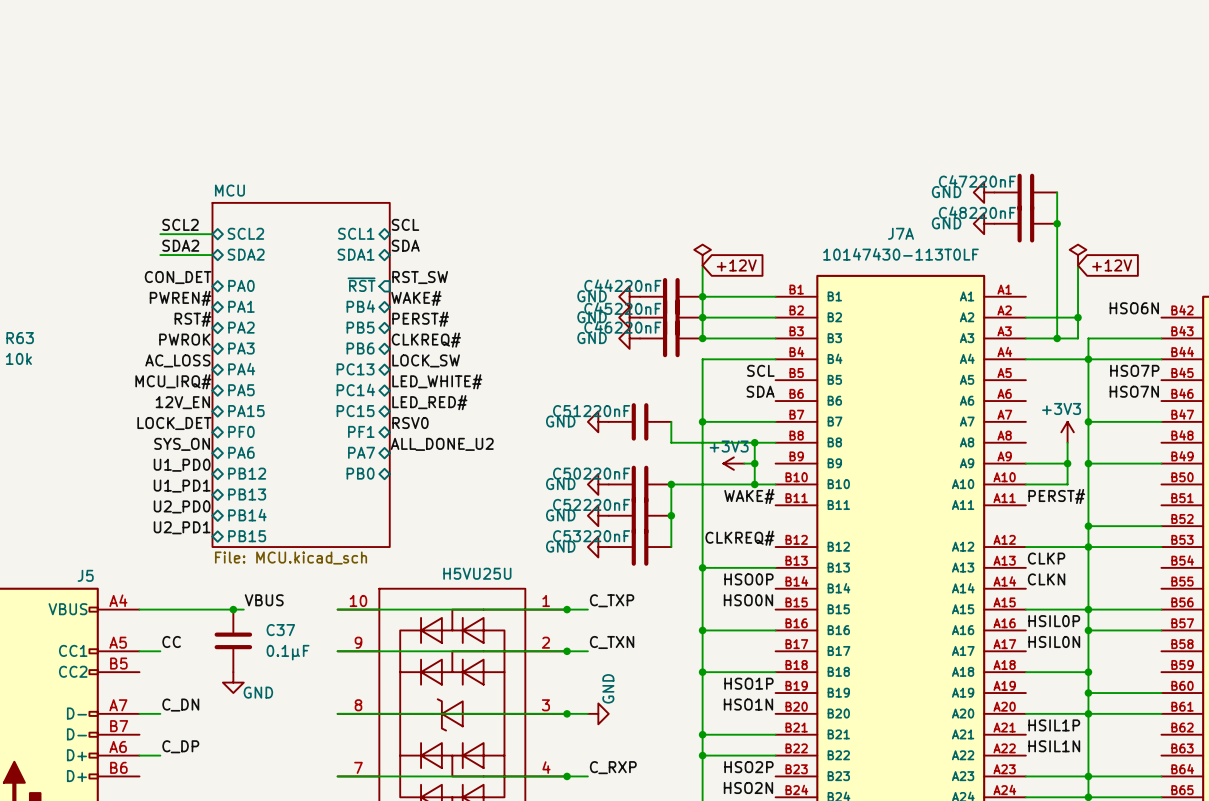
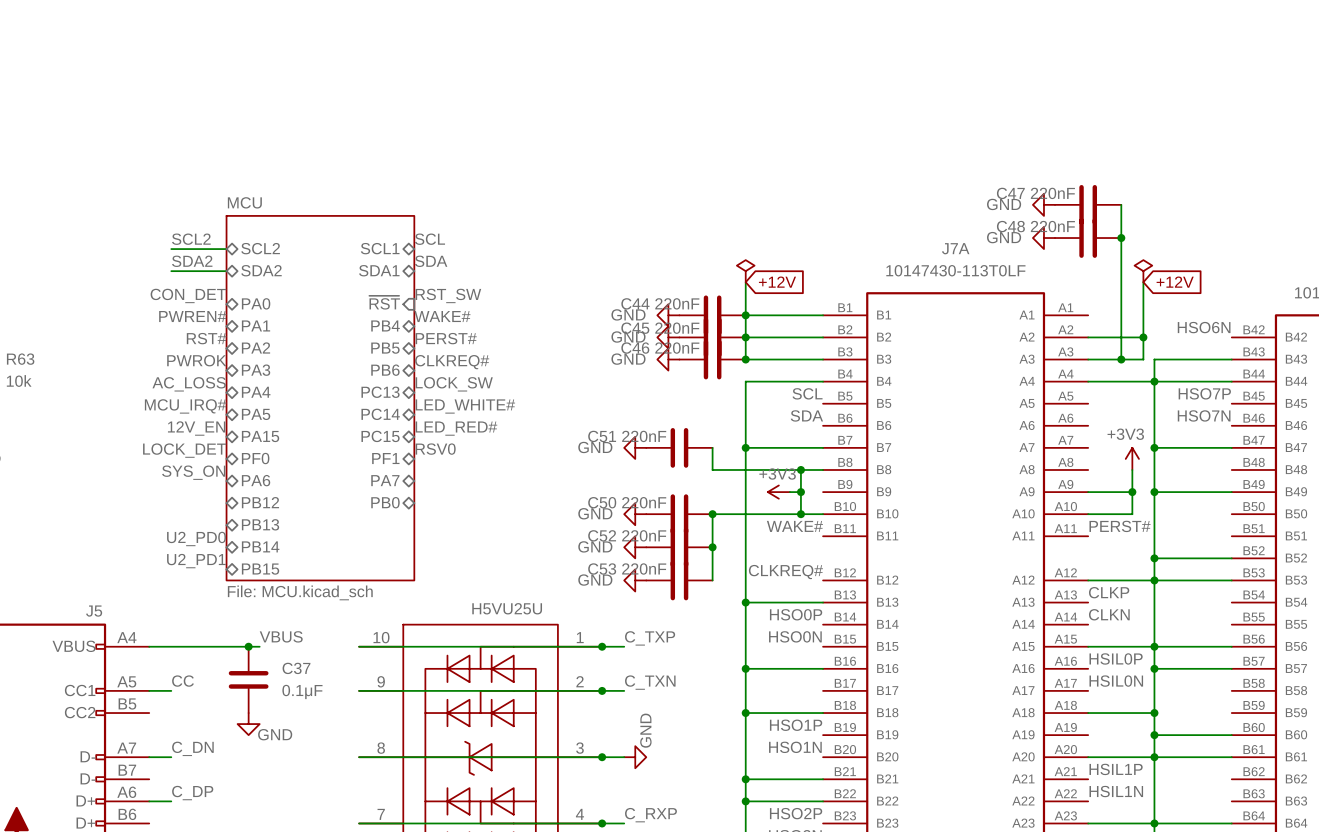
label: ALL_DONE_U2 (442, 444) -> none
label: U1_PD0 (182, 465) -> none
label: U1_PD1 (182, 486) -> none

